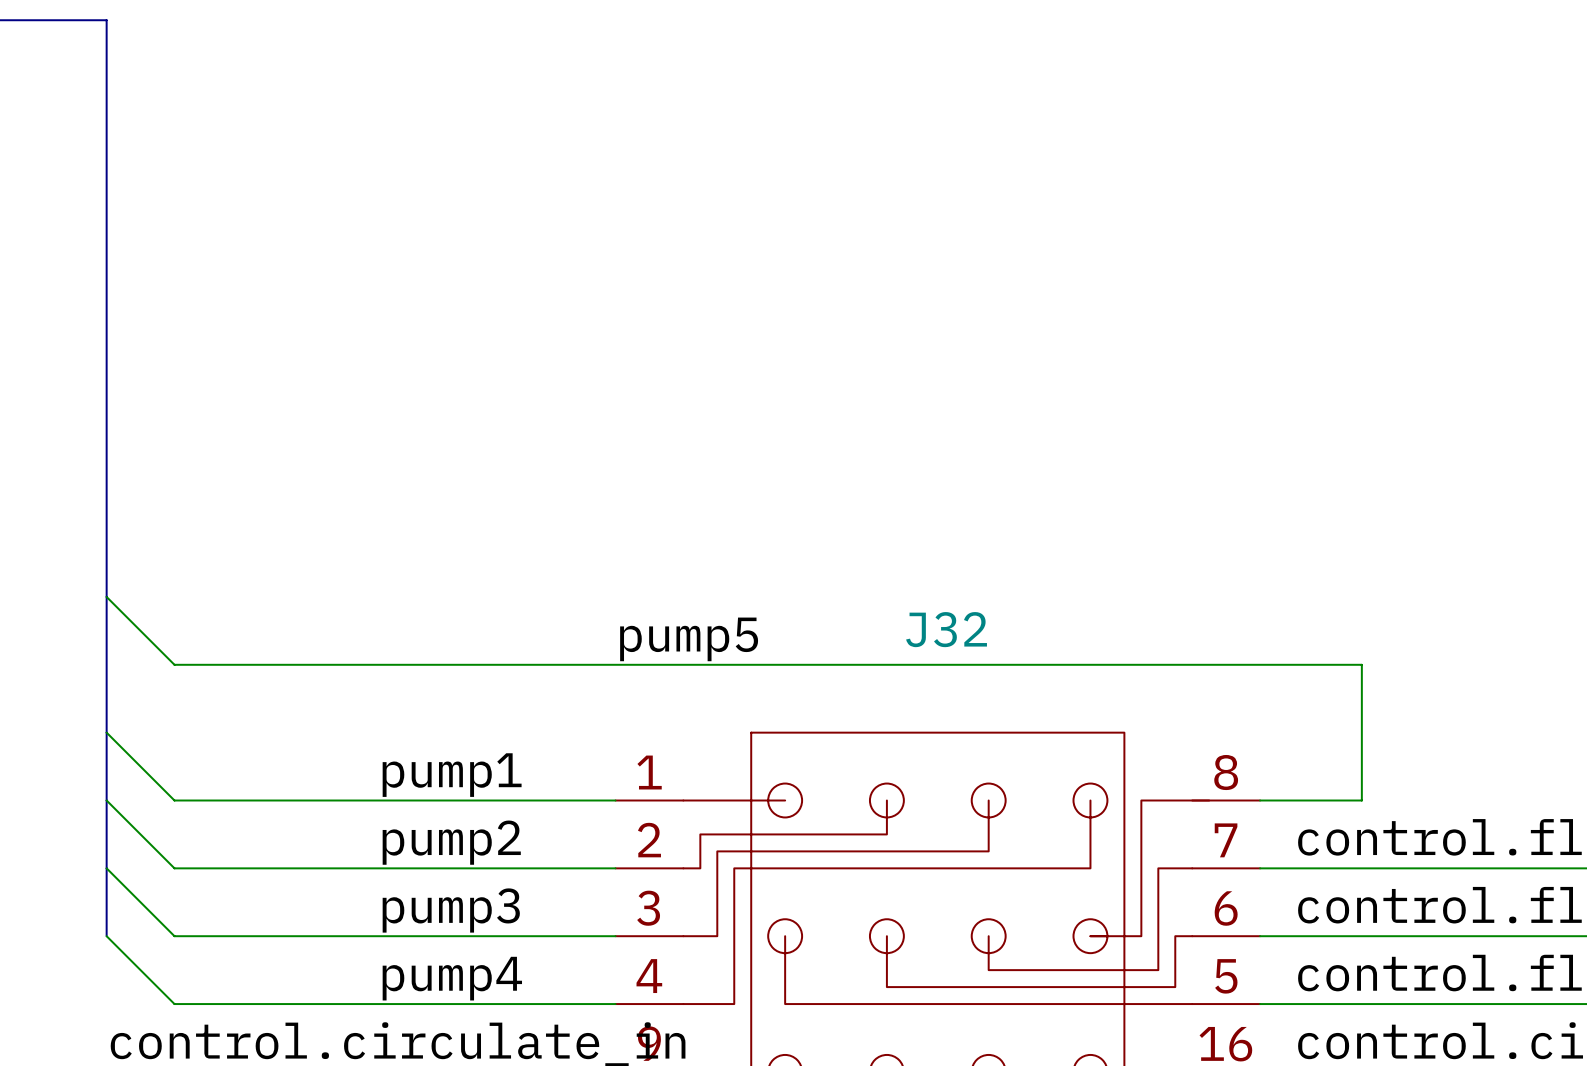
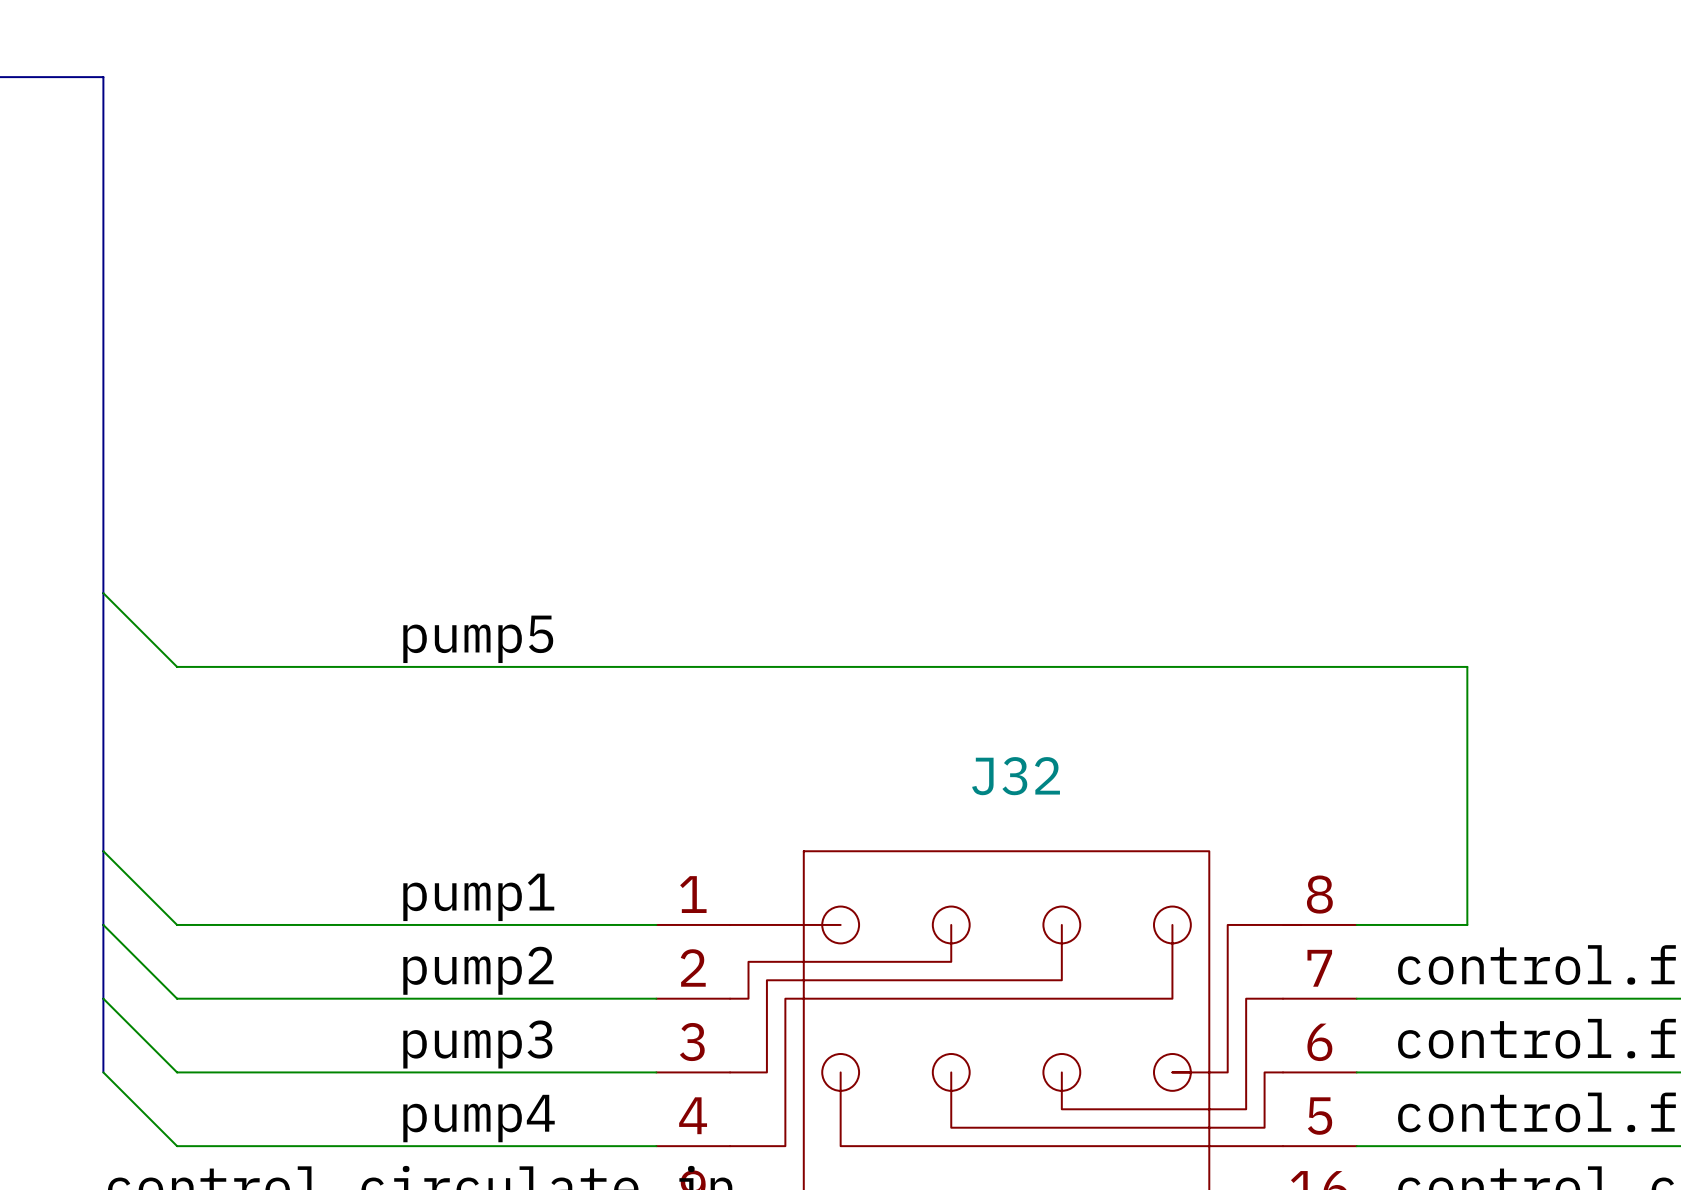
wire: (106, 596) (174, 664) (1361, 664) -> (103, 593) (177, 666) (1467, 666) (1467, 777)
J32 name position: J32 (946, 629) -> J32 (1016, 776)
label position: pump5 (689, 639) -> pump5 (478, 639)

